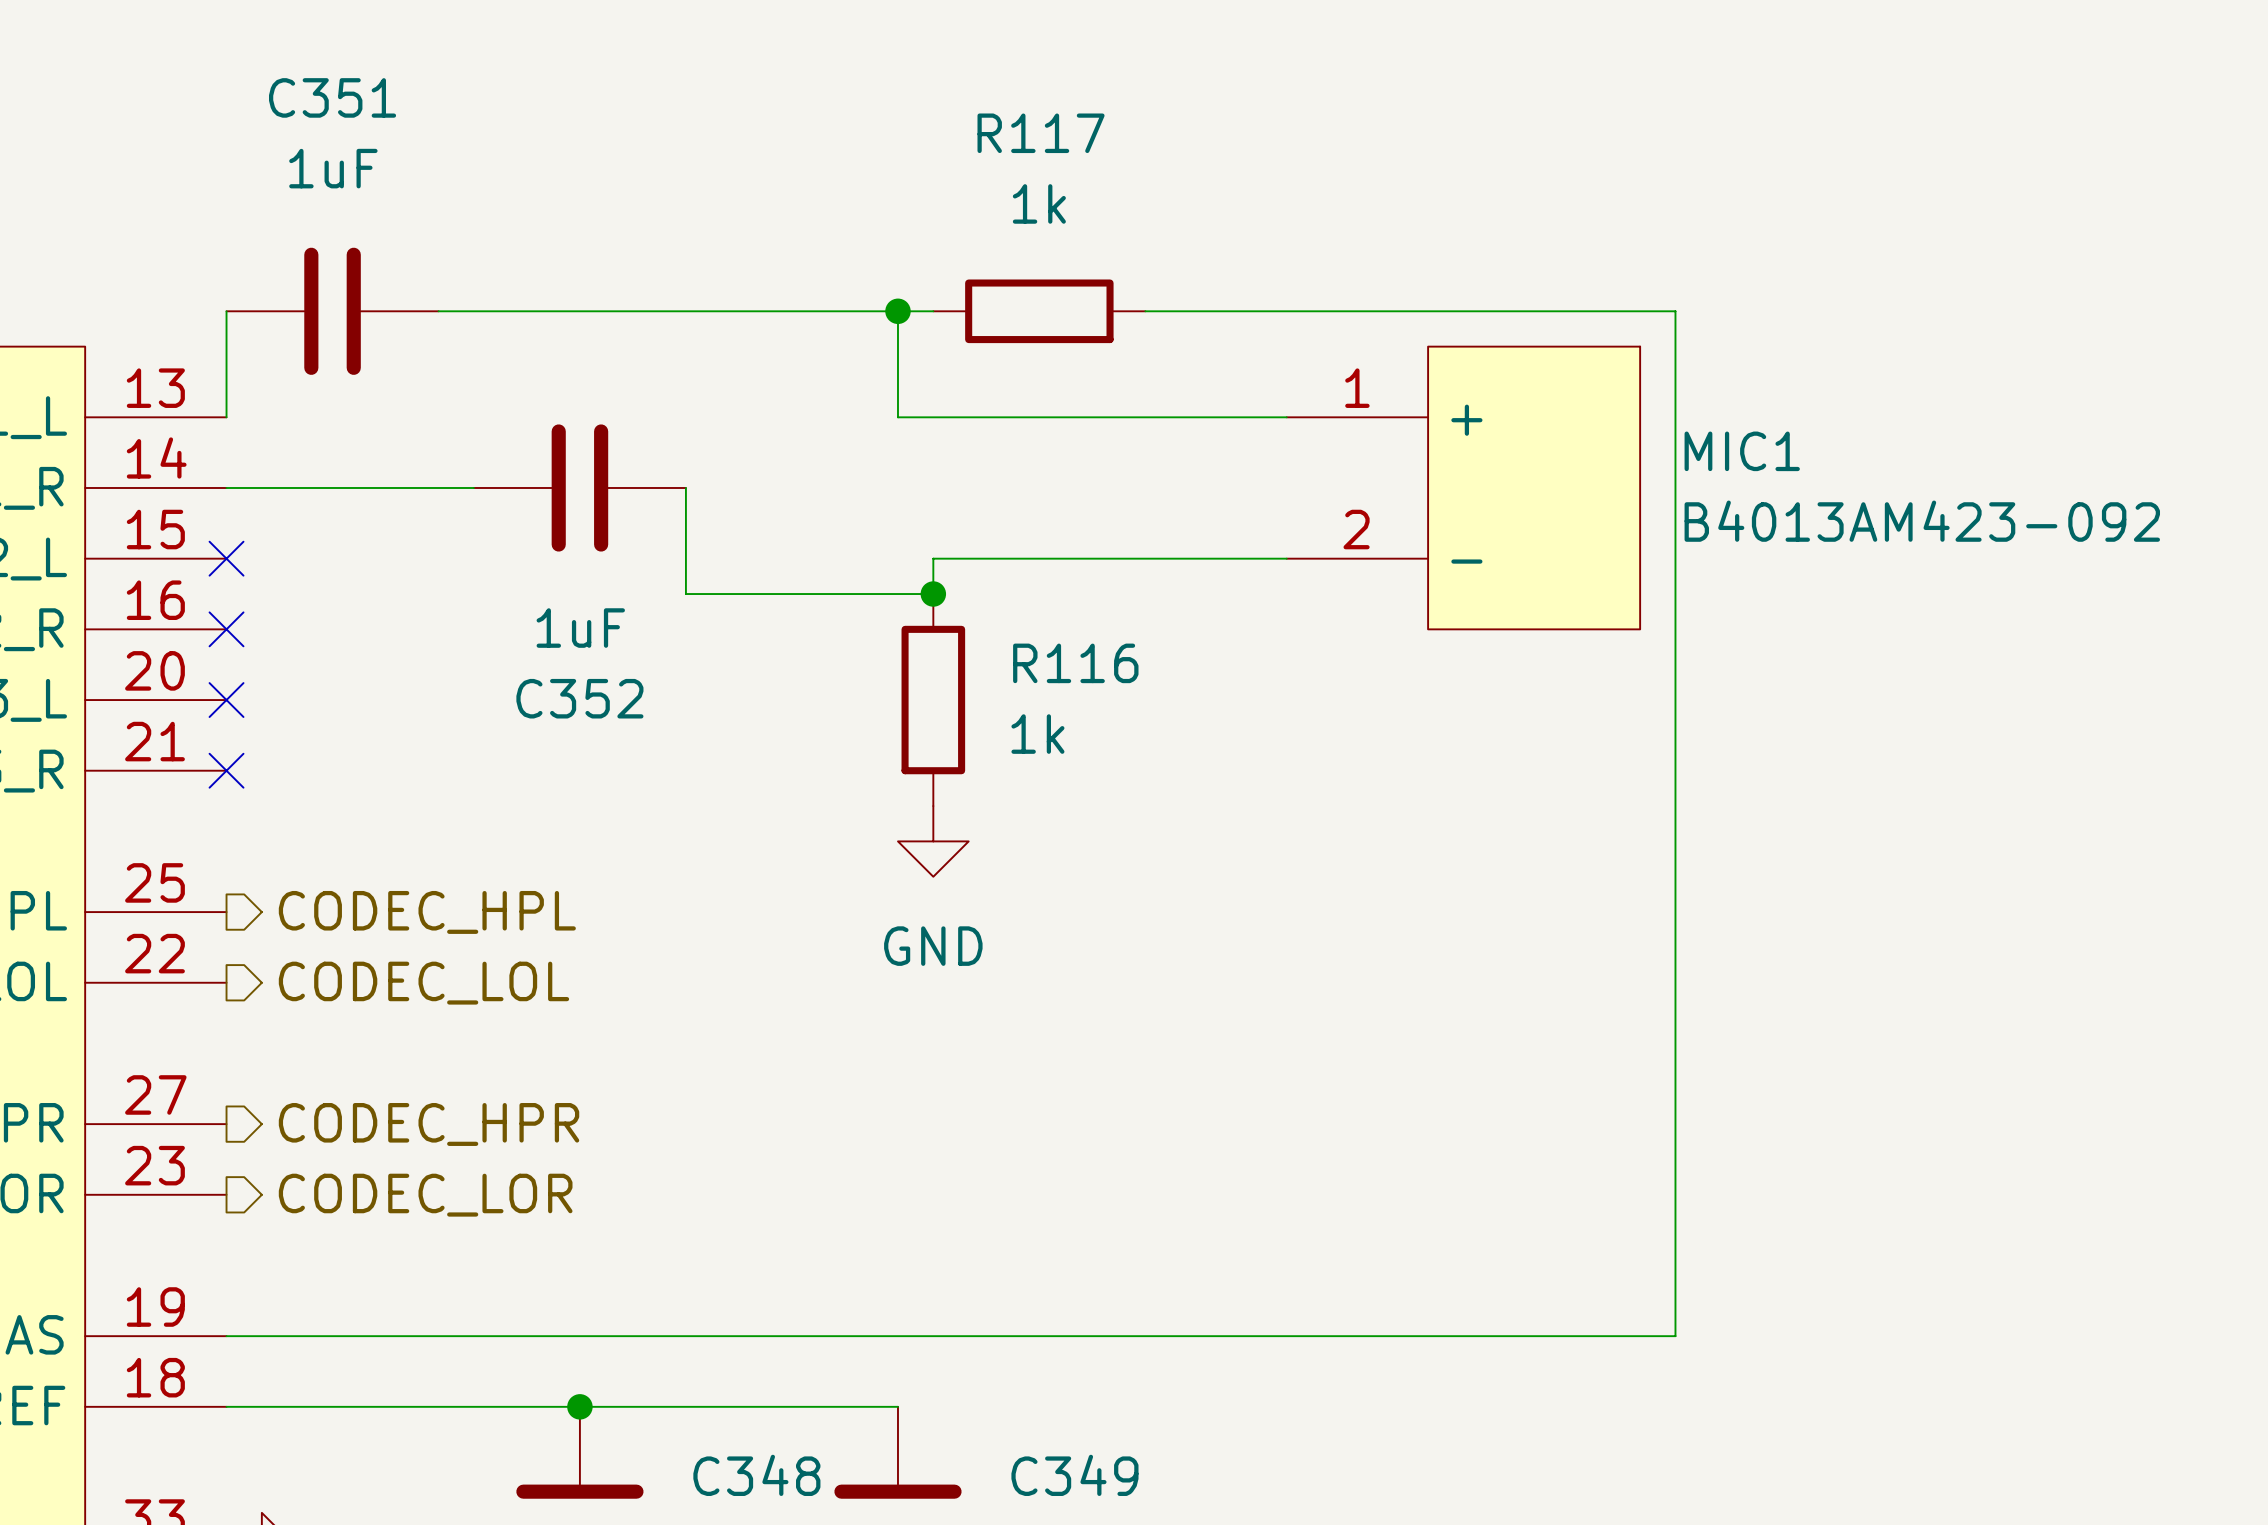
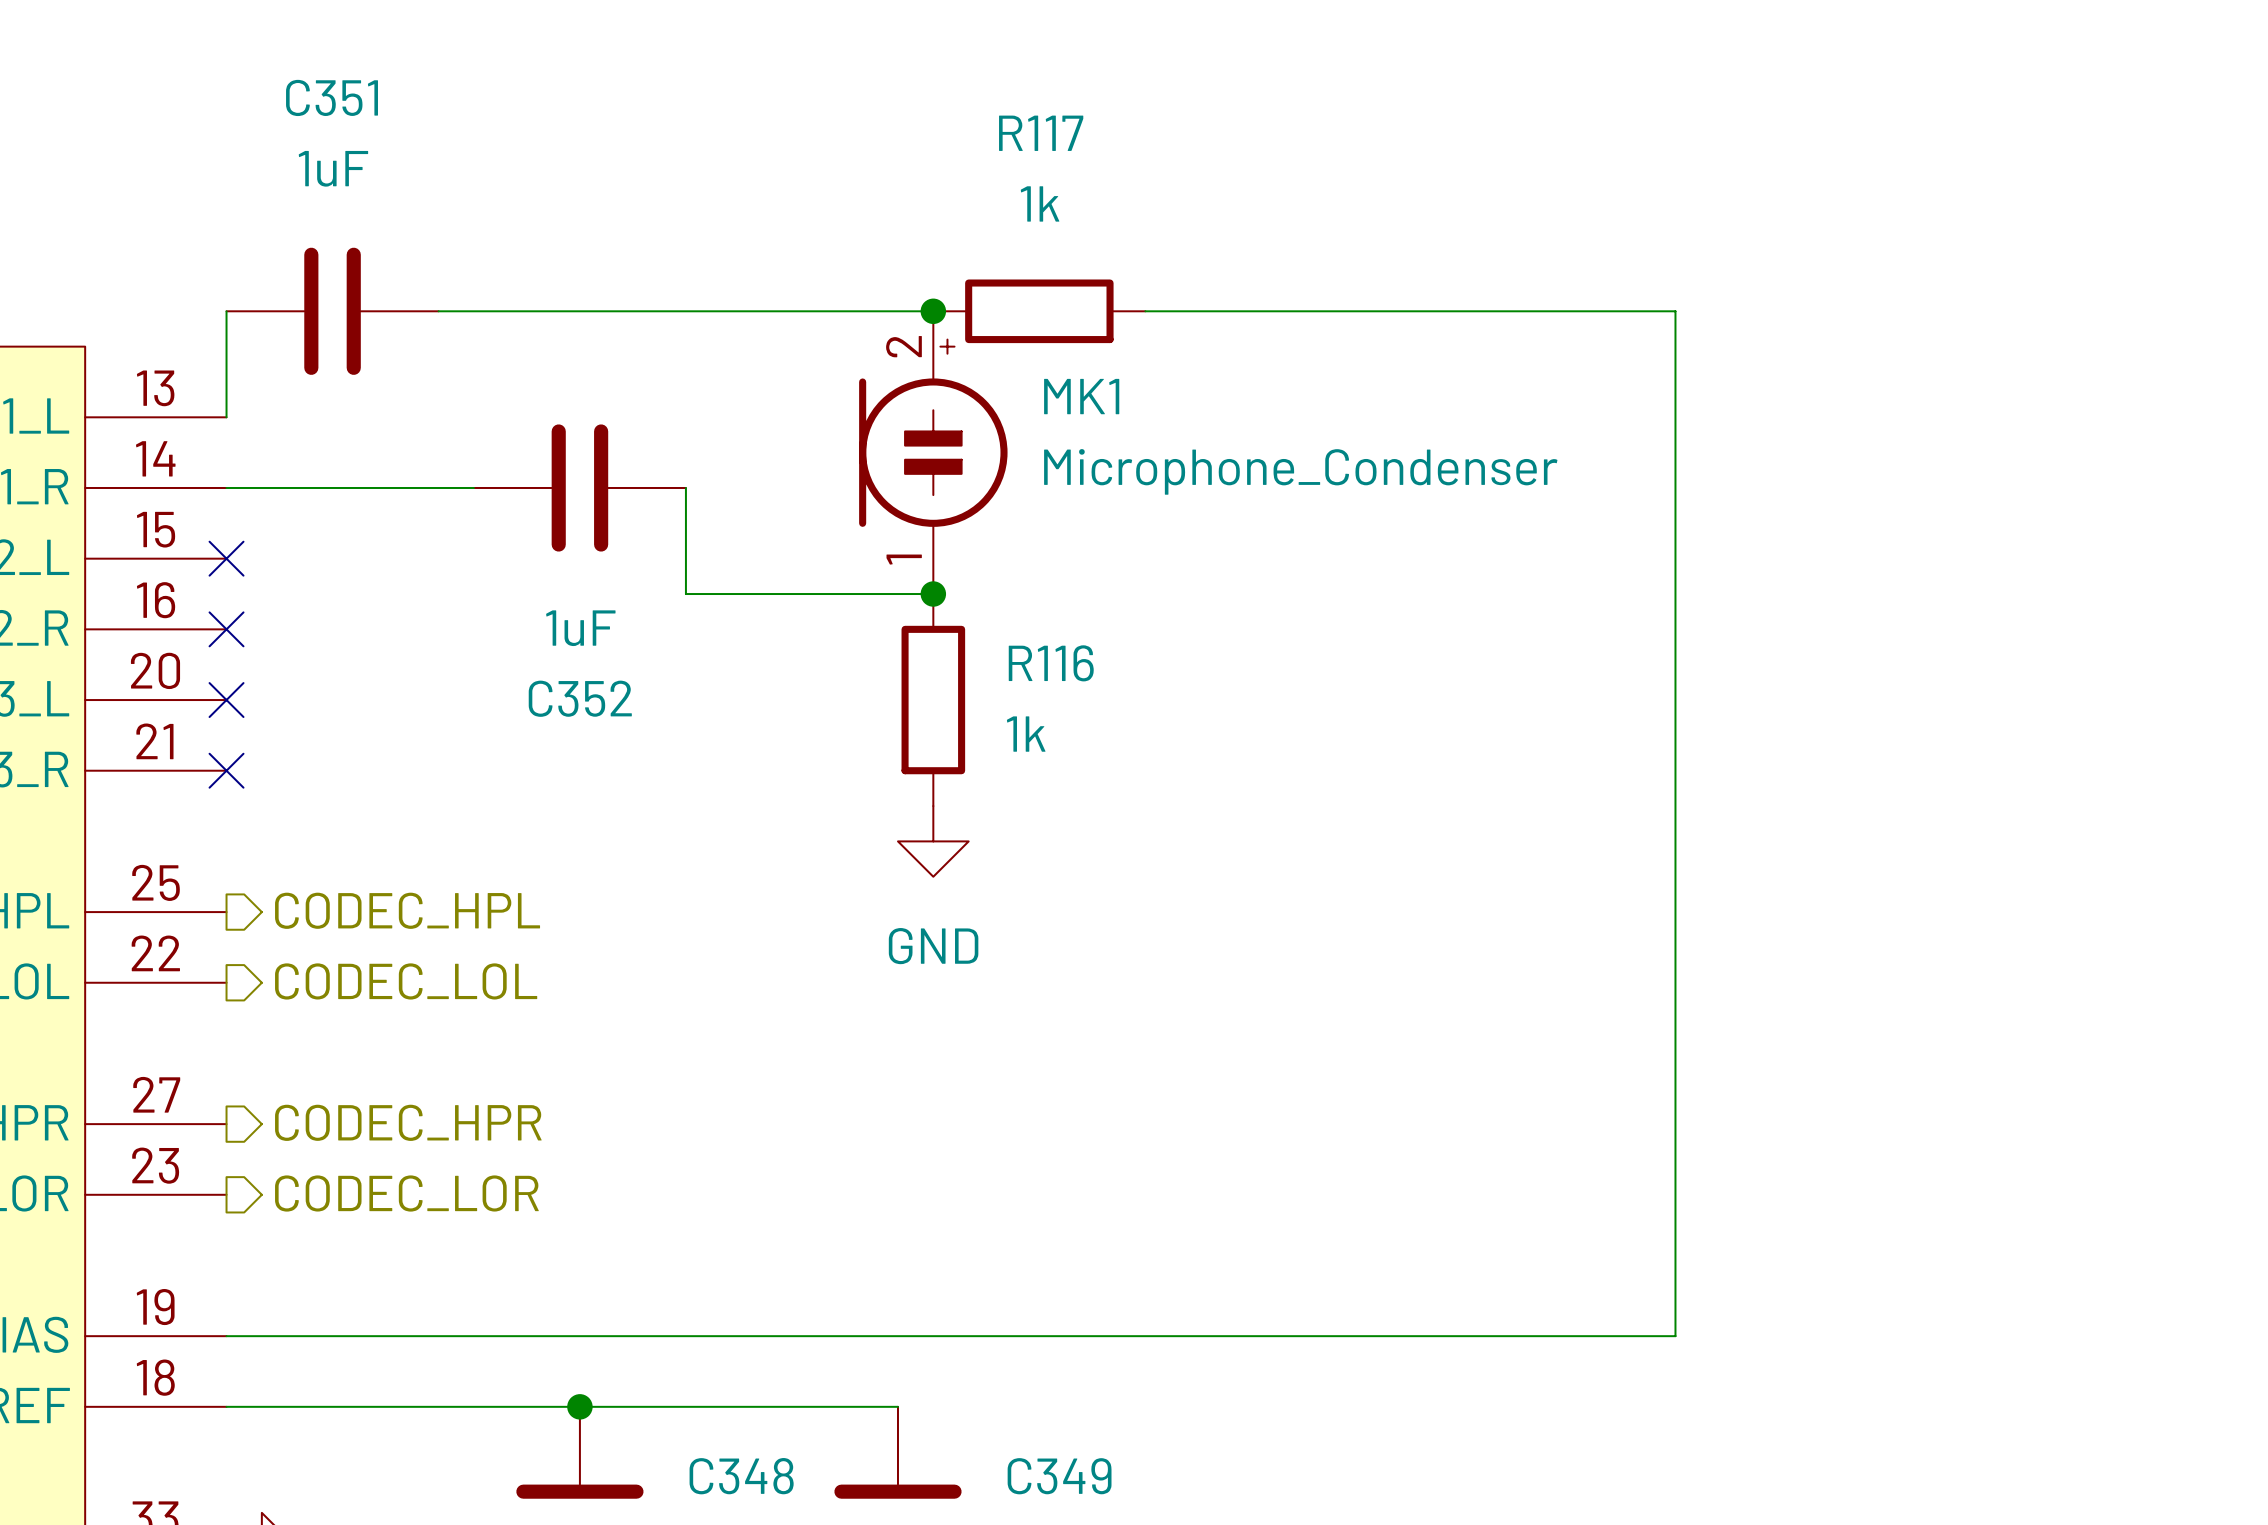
wire: (897, 311) (897, 417) (1286, 417) -> none
junction position: (897, 311) -> (933, 311)
MK1: none -> Microphone_Condenser (933, 452)
MIC1: B4013AM423-092 (1463, 487) -> none
wire: (1286, 558) (933, 558) (933, 594) -> none

